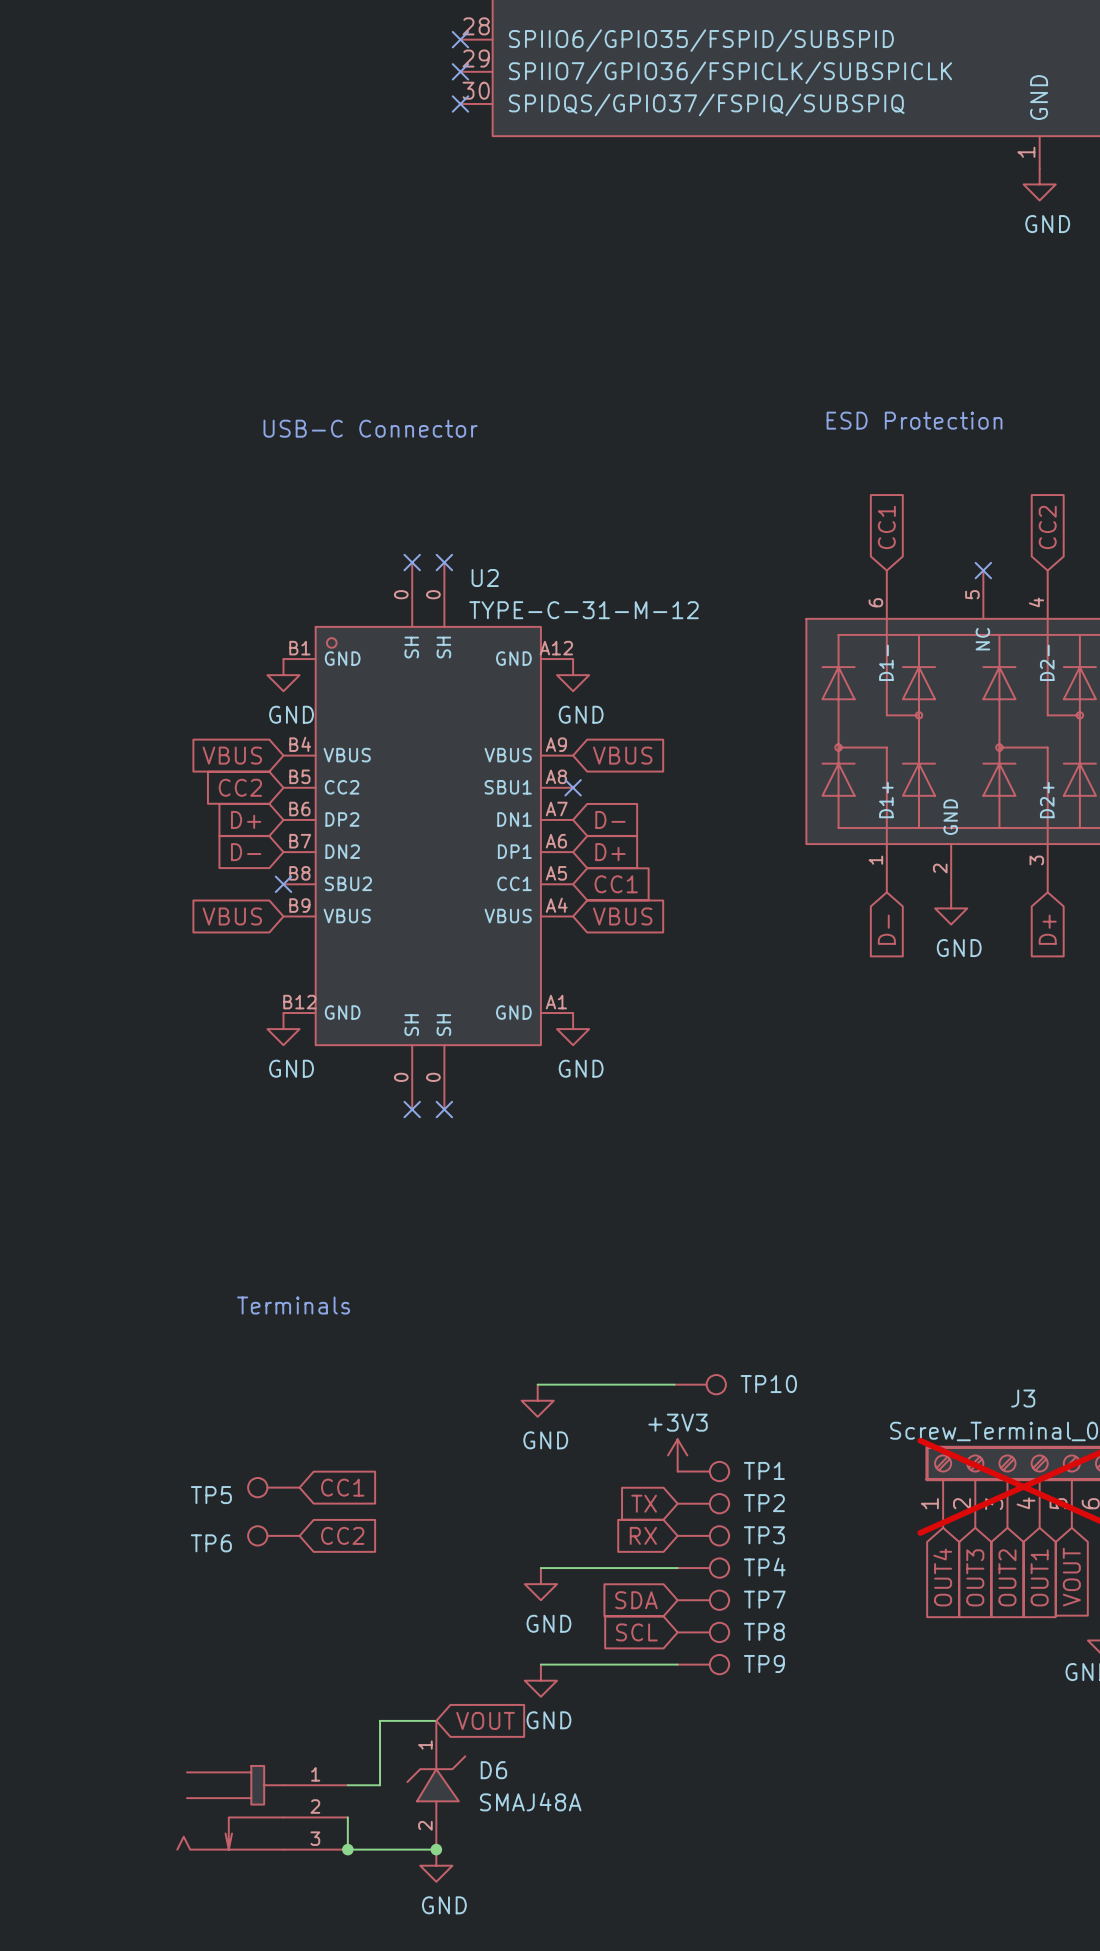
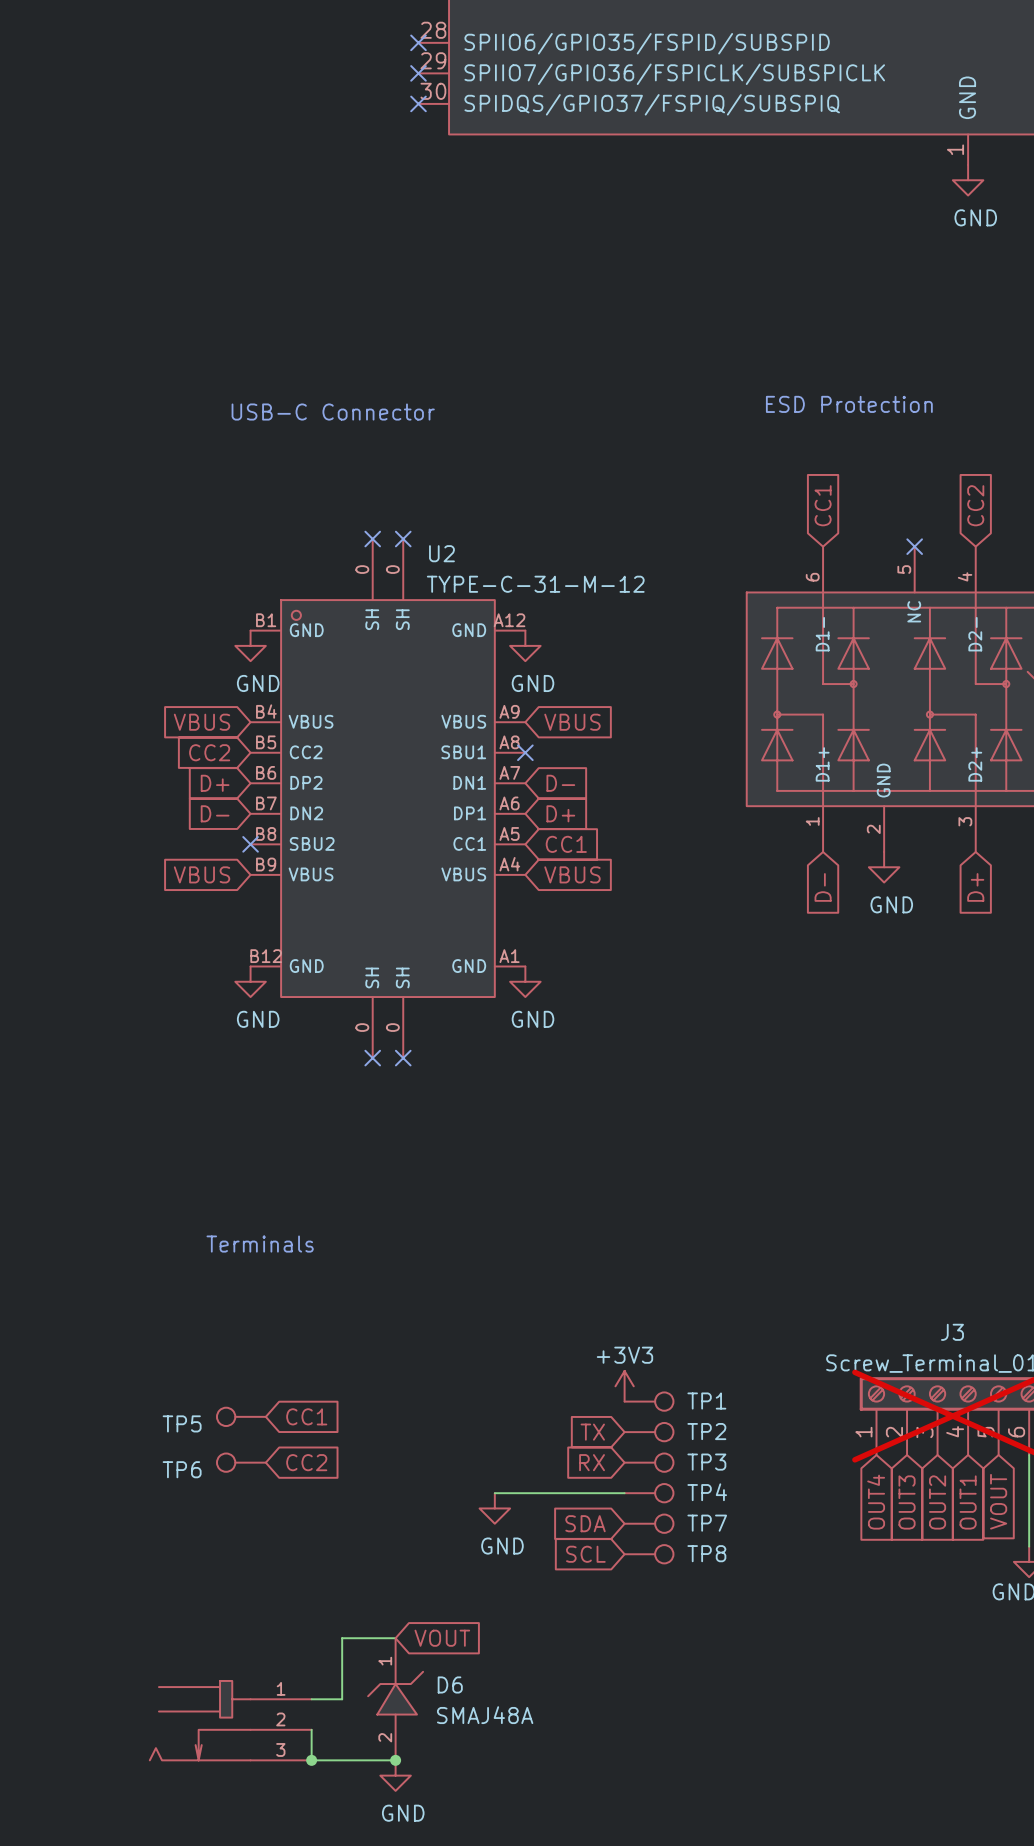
wire: (537, 1384) (674, 1384) -> none
TP10: (700, 1384) -> none
power symbol: GND (537, 1400) -> none
wire: (540, 1664) (677, 1664) -> none
TP9: (703, 1664) -> none
power symbol: GND (540, 1680) -> none

